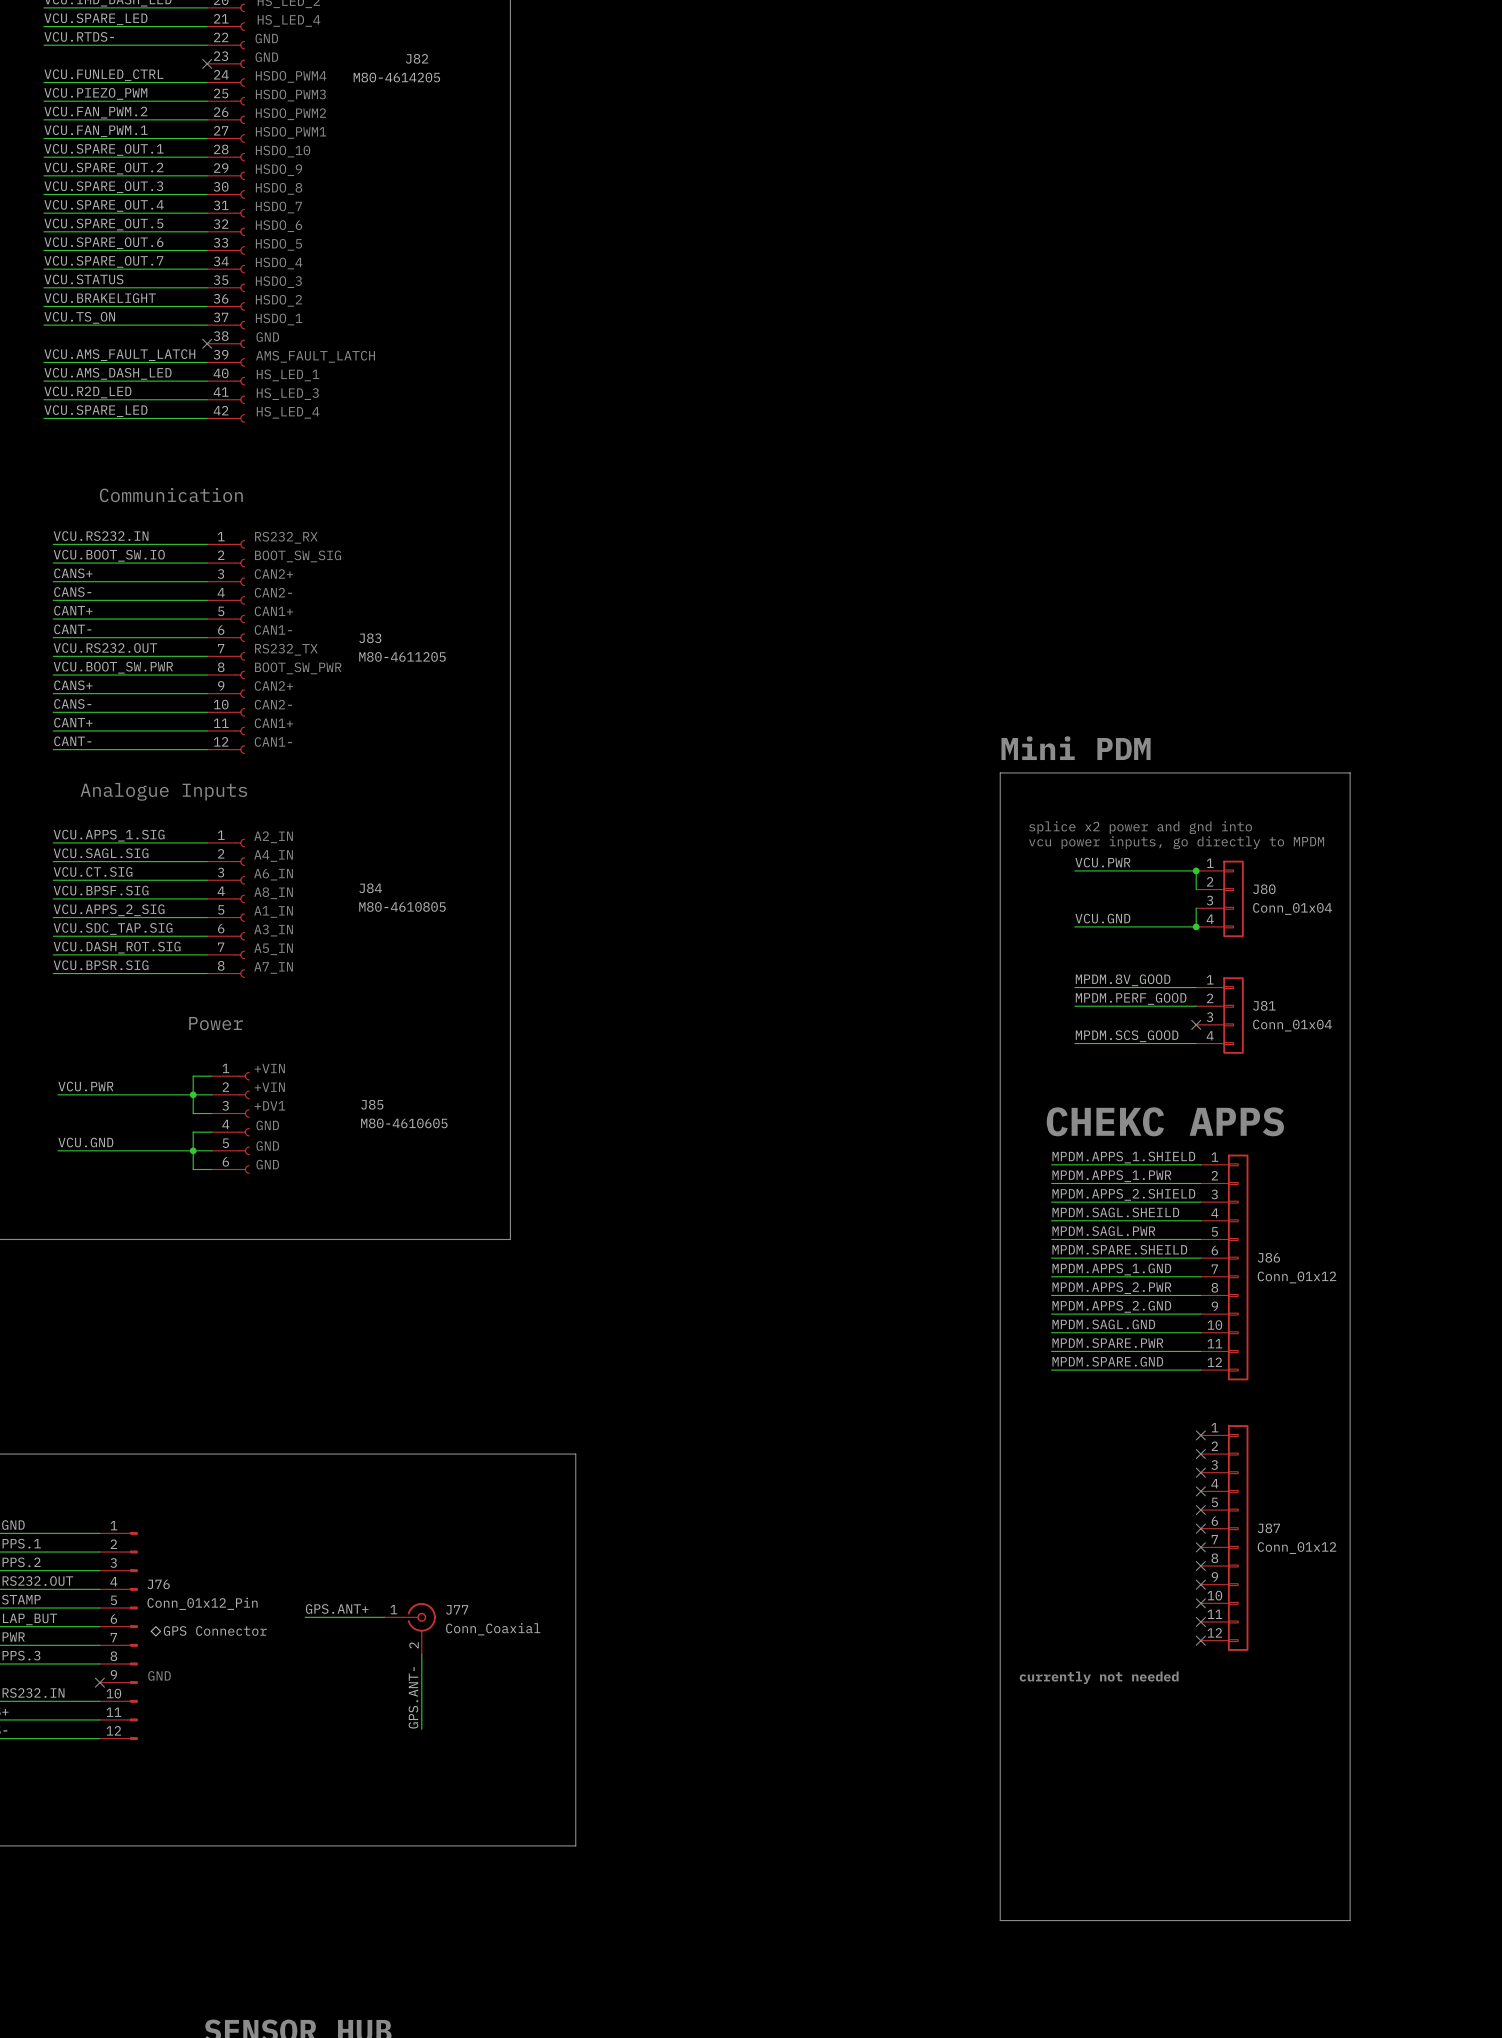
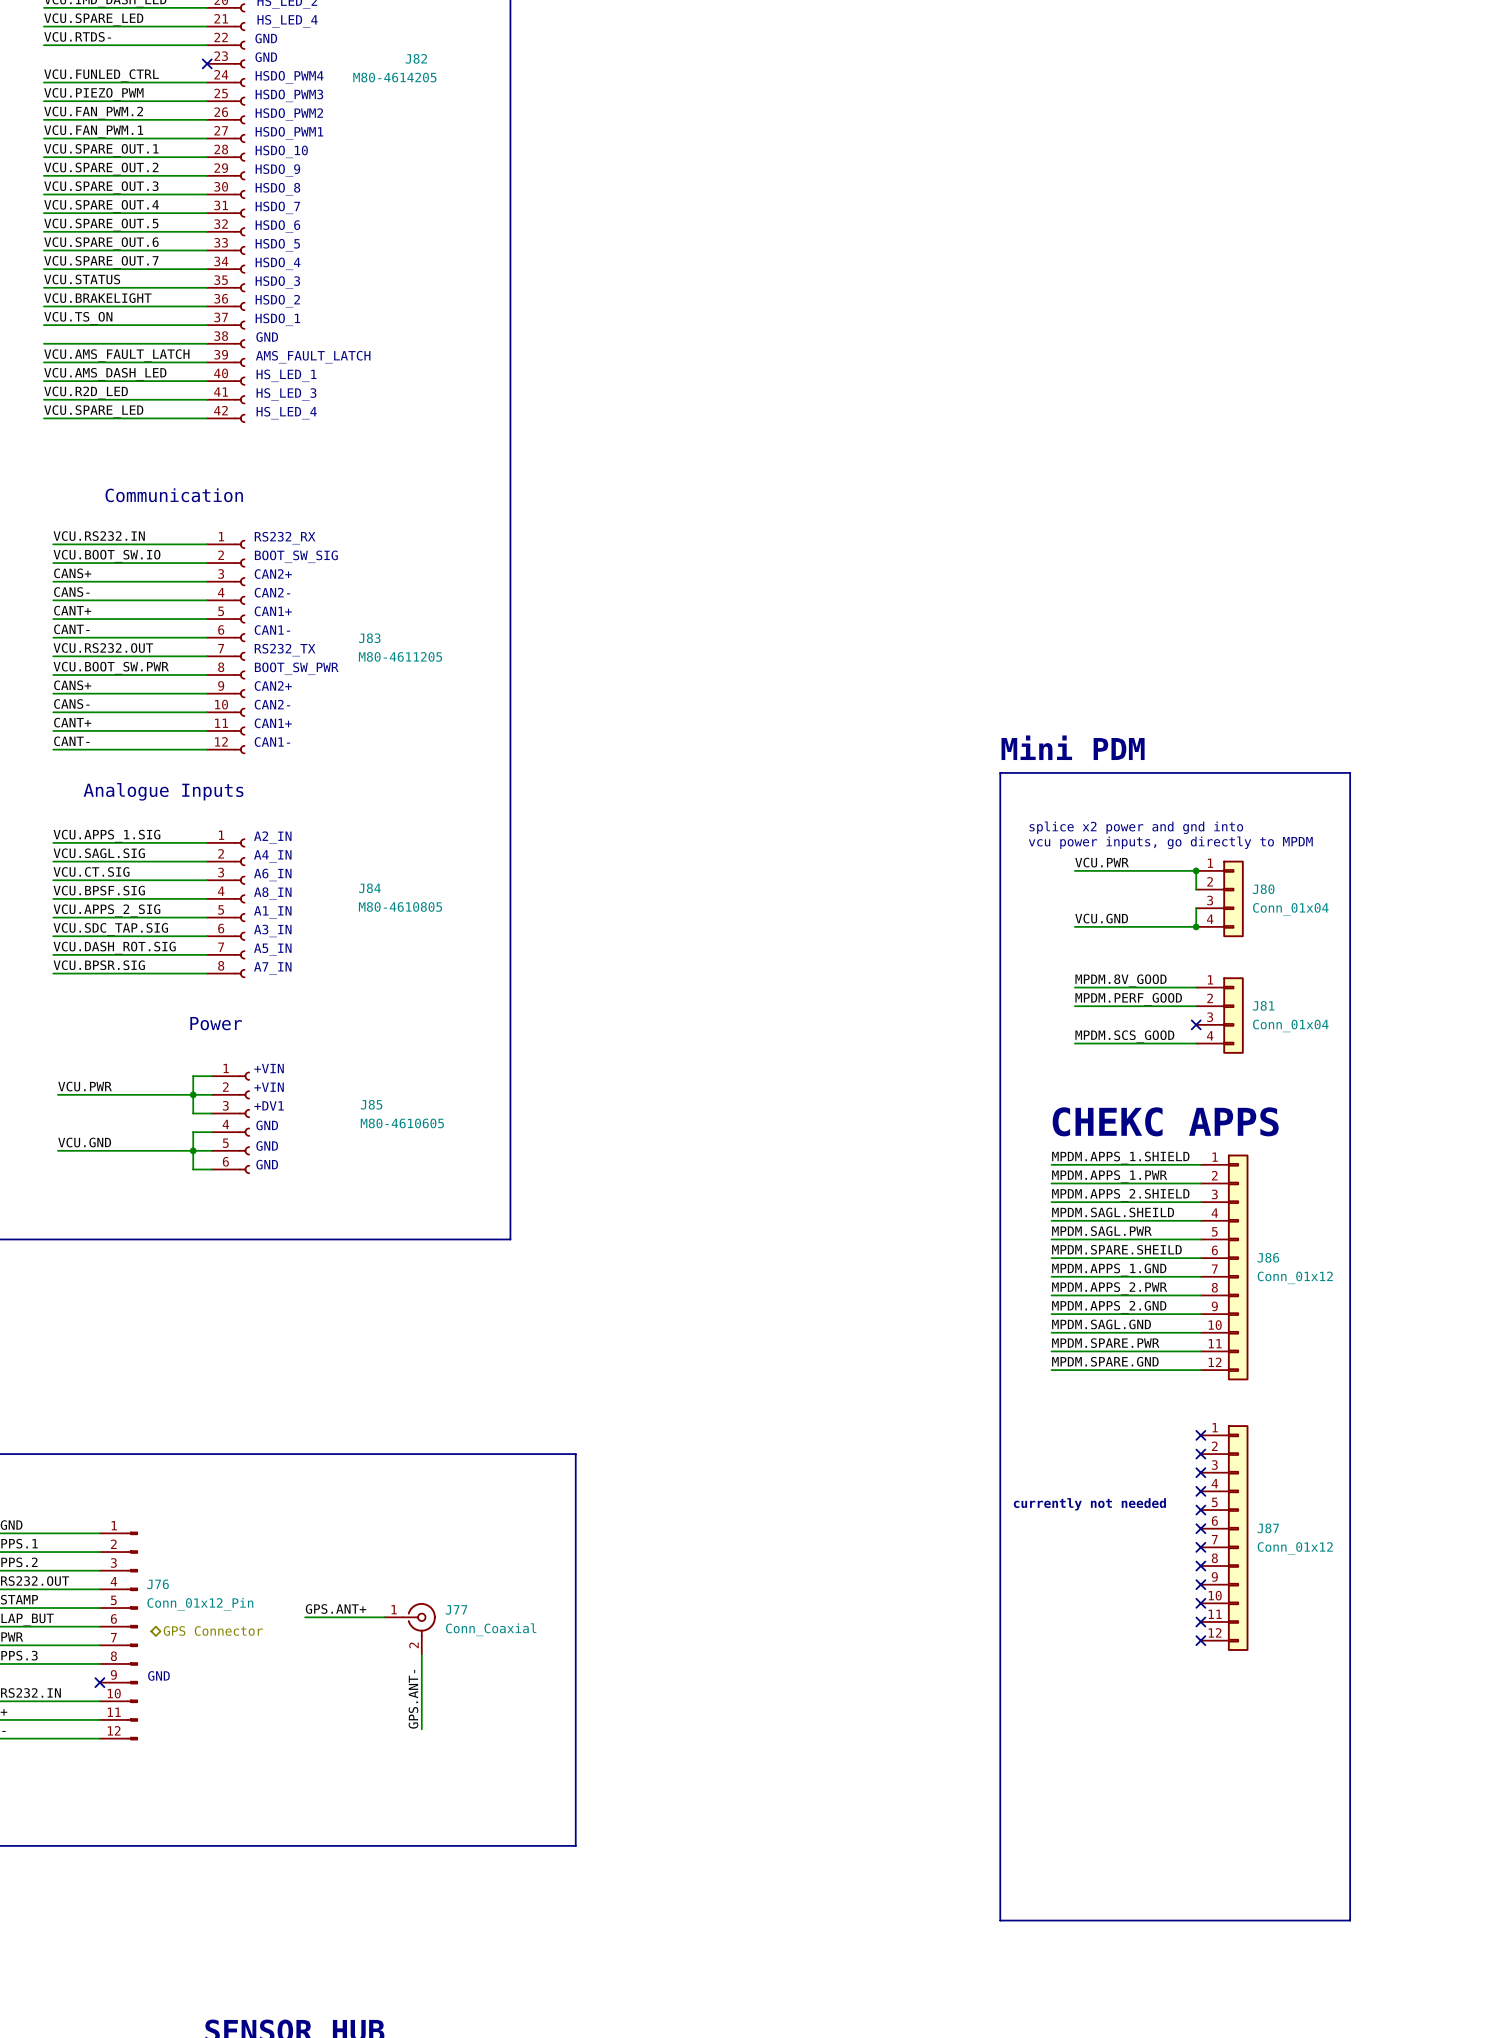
wire: none -> (43, 343) (207, 343)
no-connect mark: (207, 343) -> none
text position: currently not needed (1099, 1677) -> currently not needed (1089, 1504)

